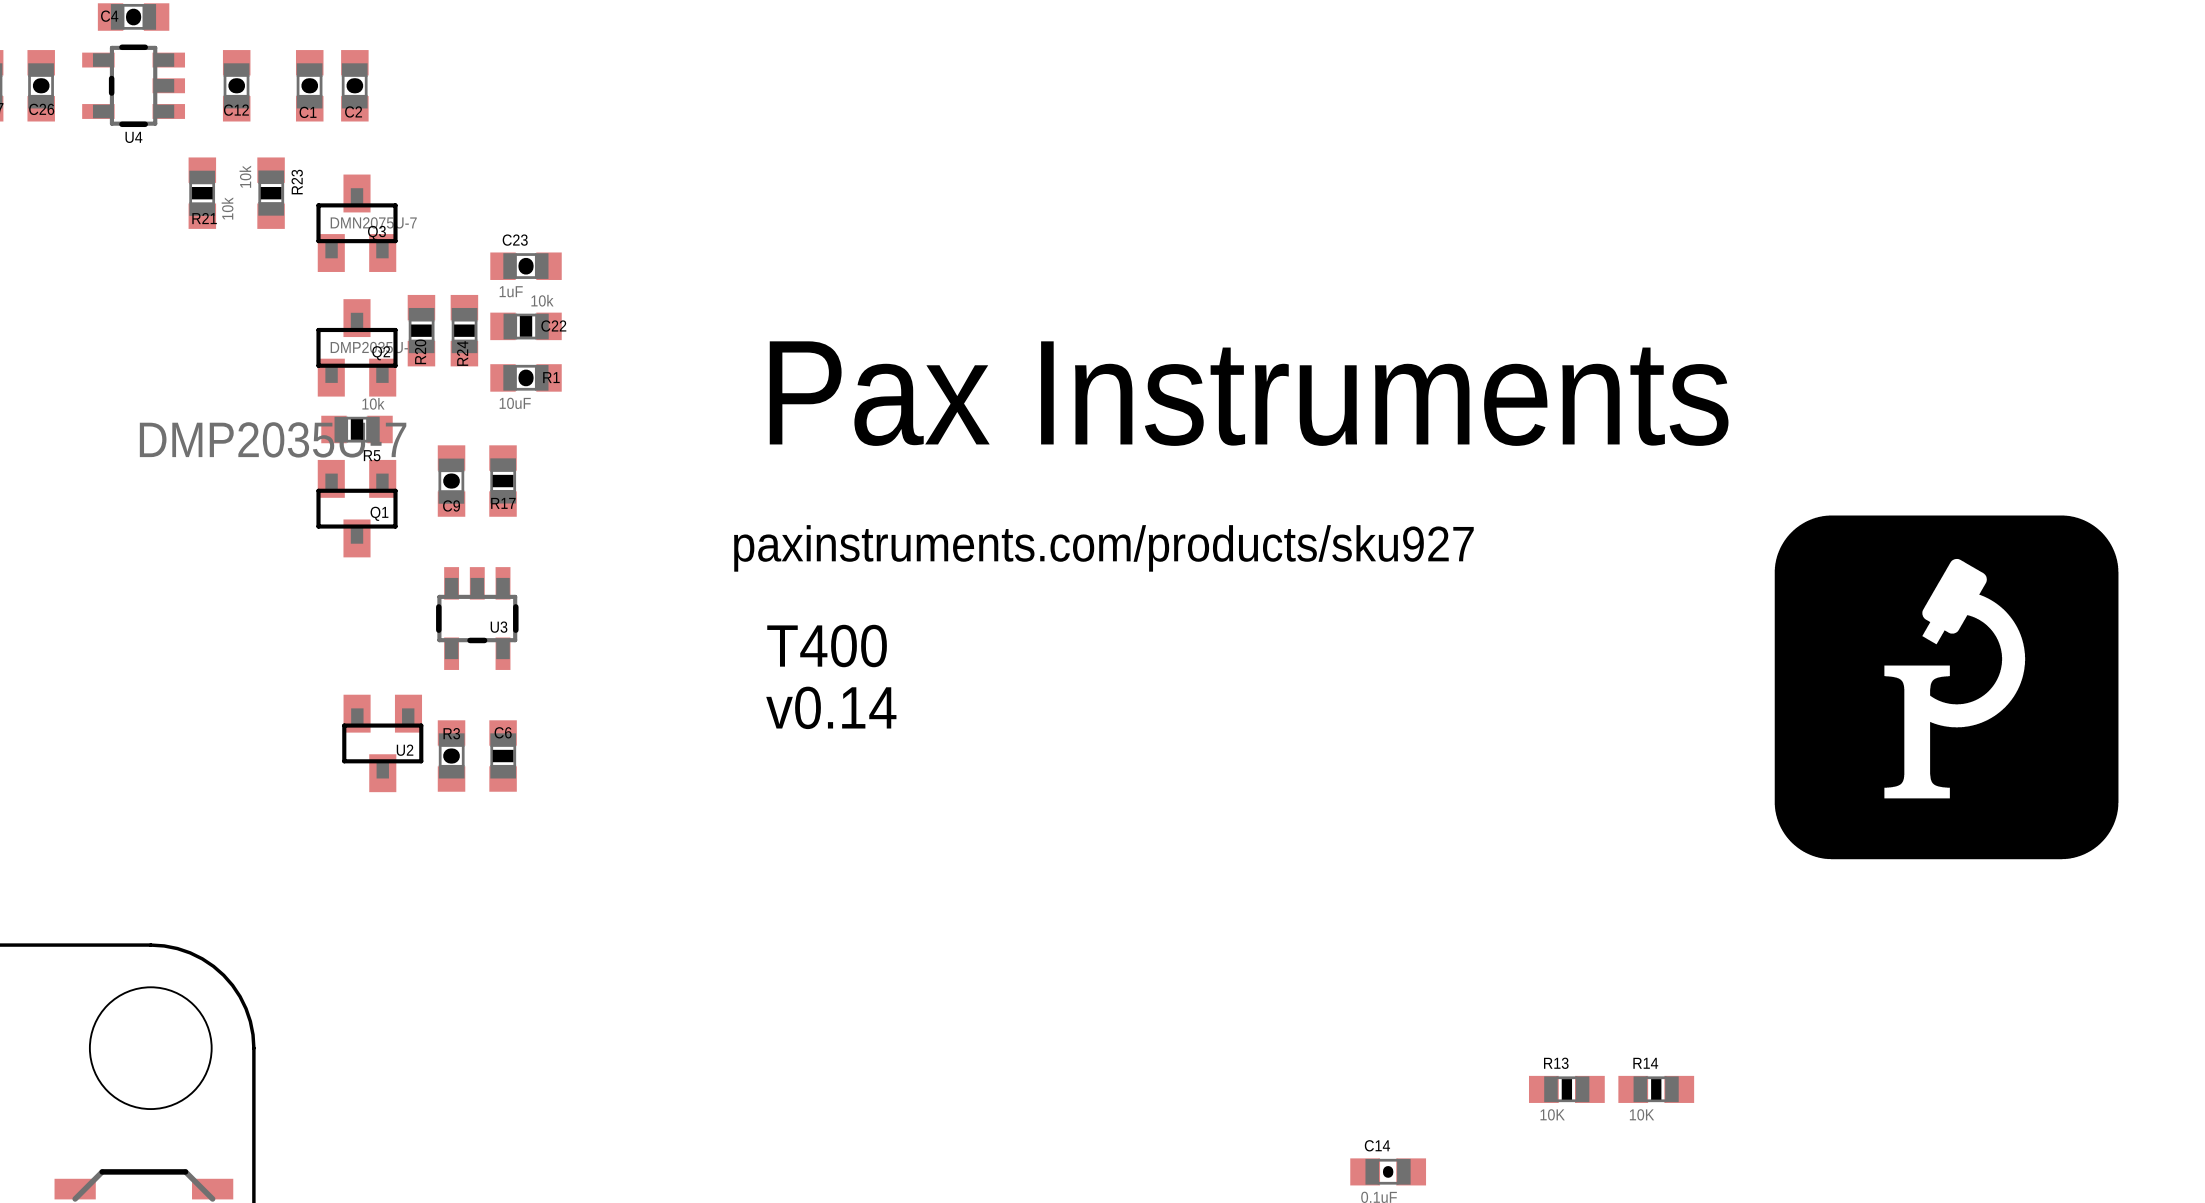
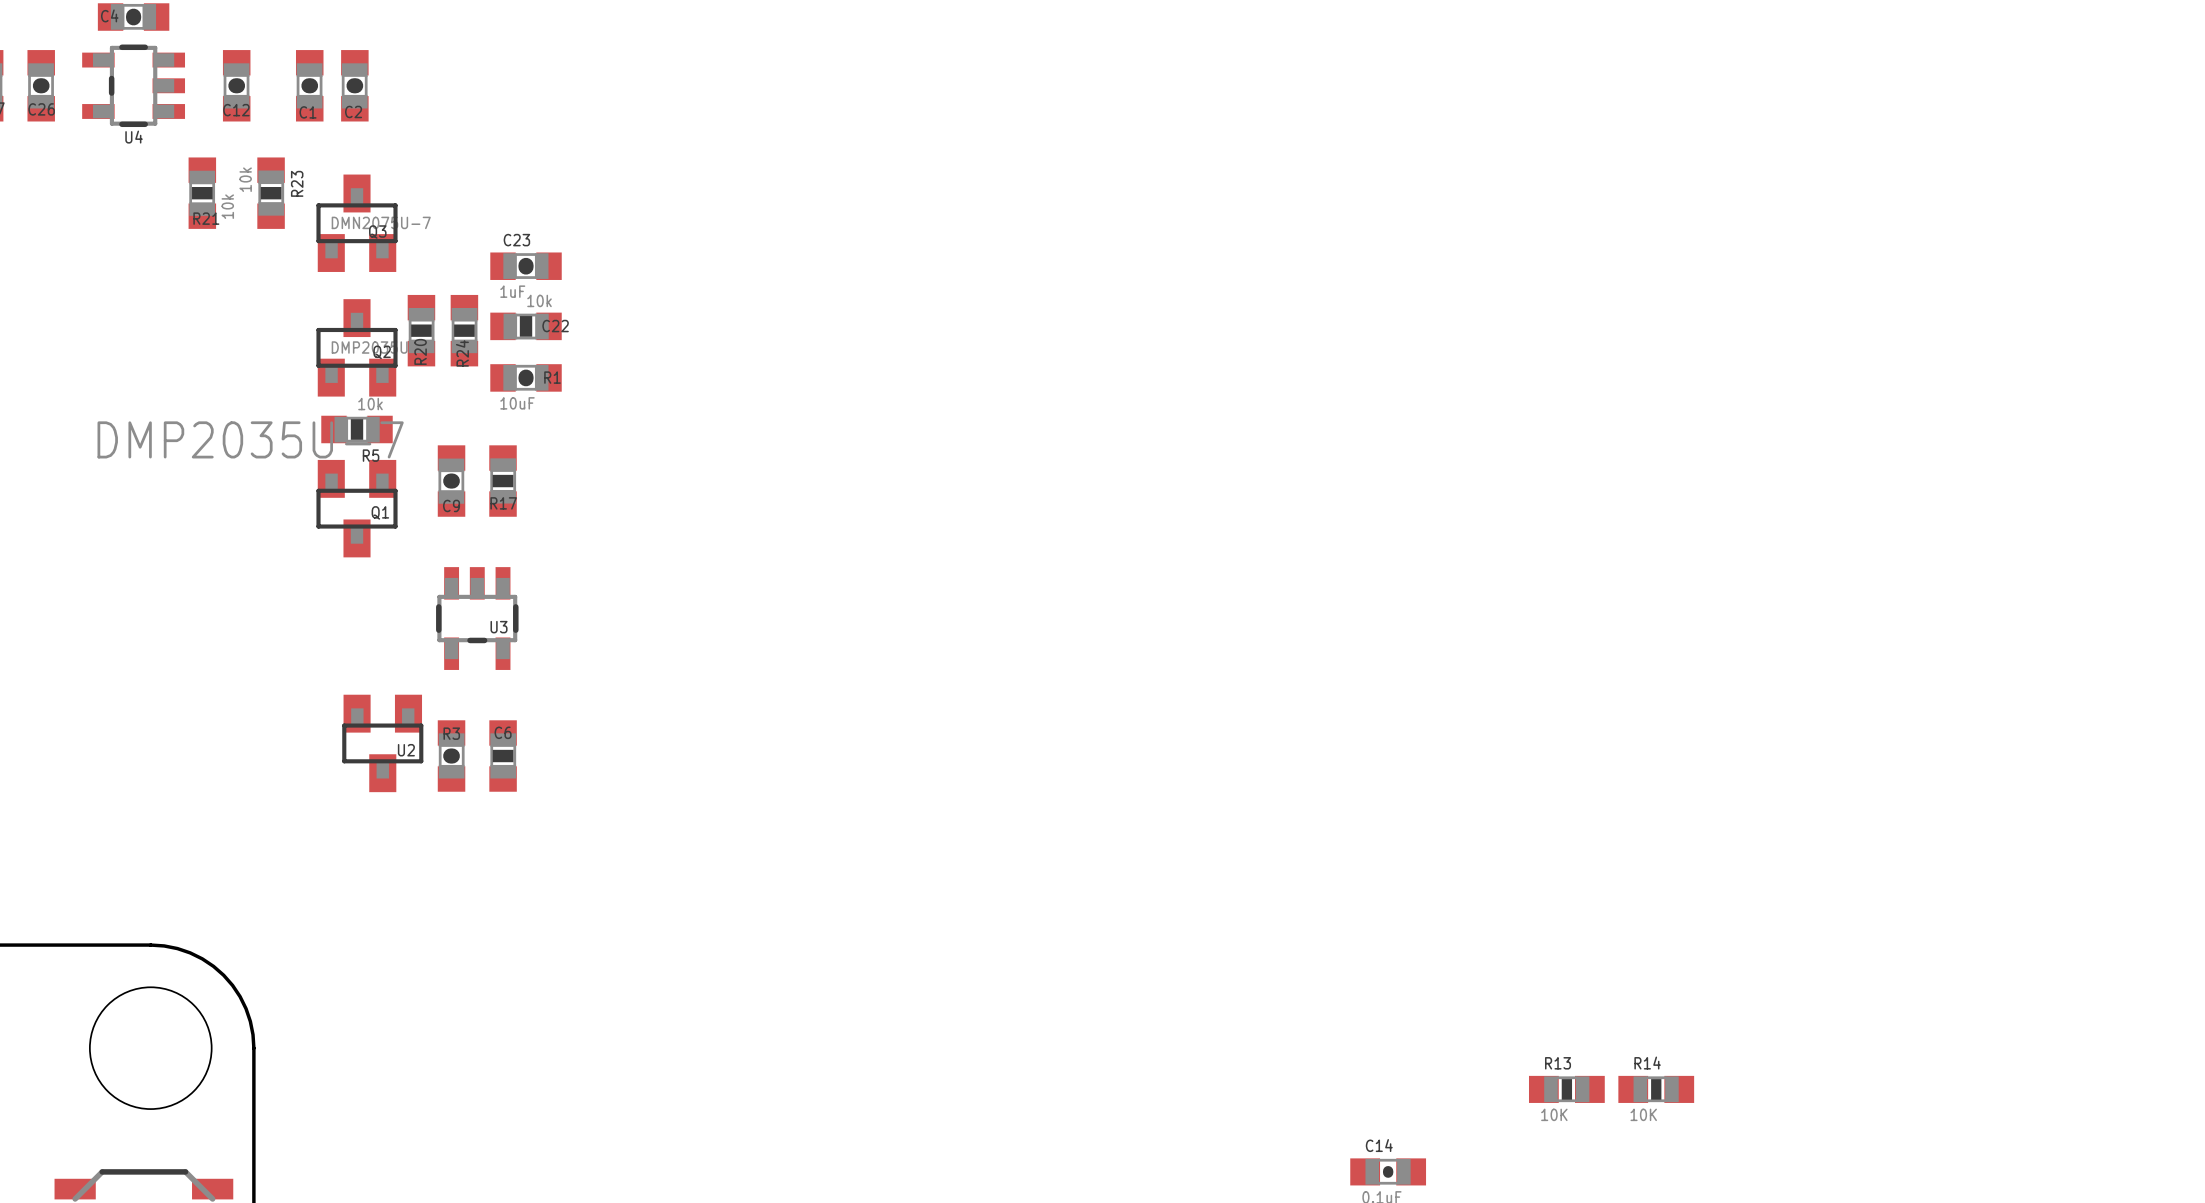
text: Pax Instruments (1249, 393) -> none
drawing: [1774, 515, 2119, 860] -> none
text: paxinstruments.com/products/sku927 (1103, 548) -> none
text: T400 (827, 646) -> none
text: v0.14 (831, 707) -> none

